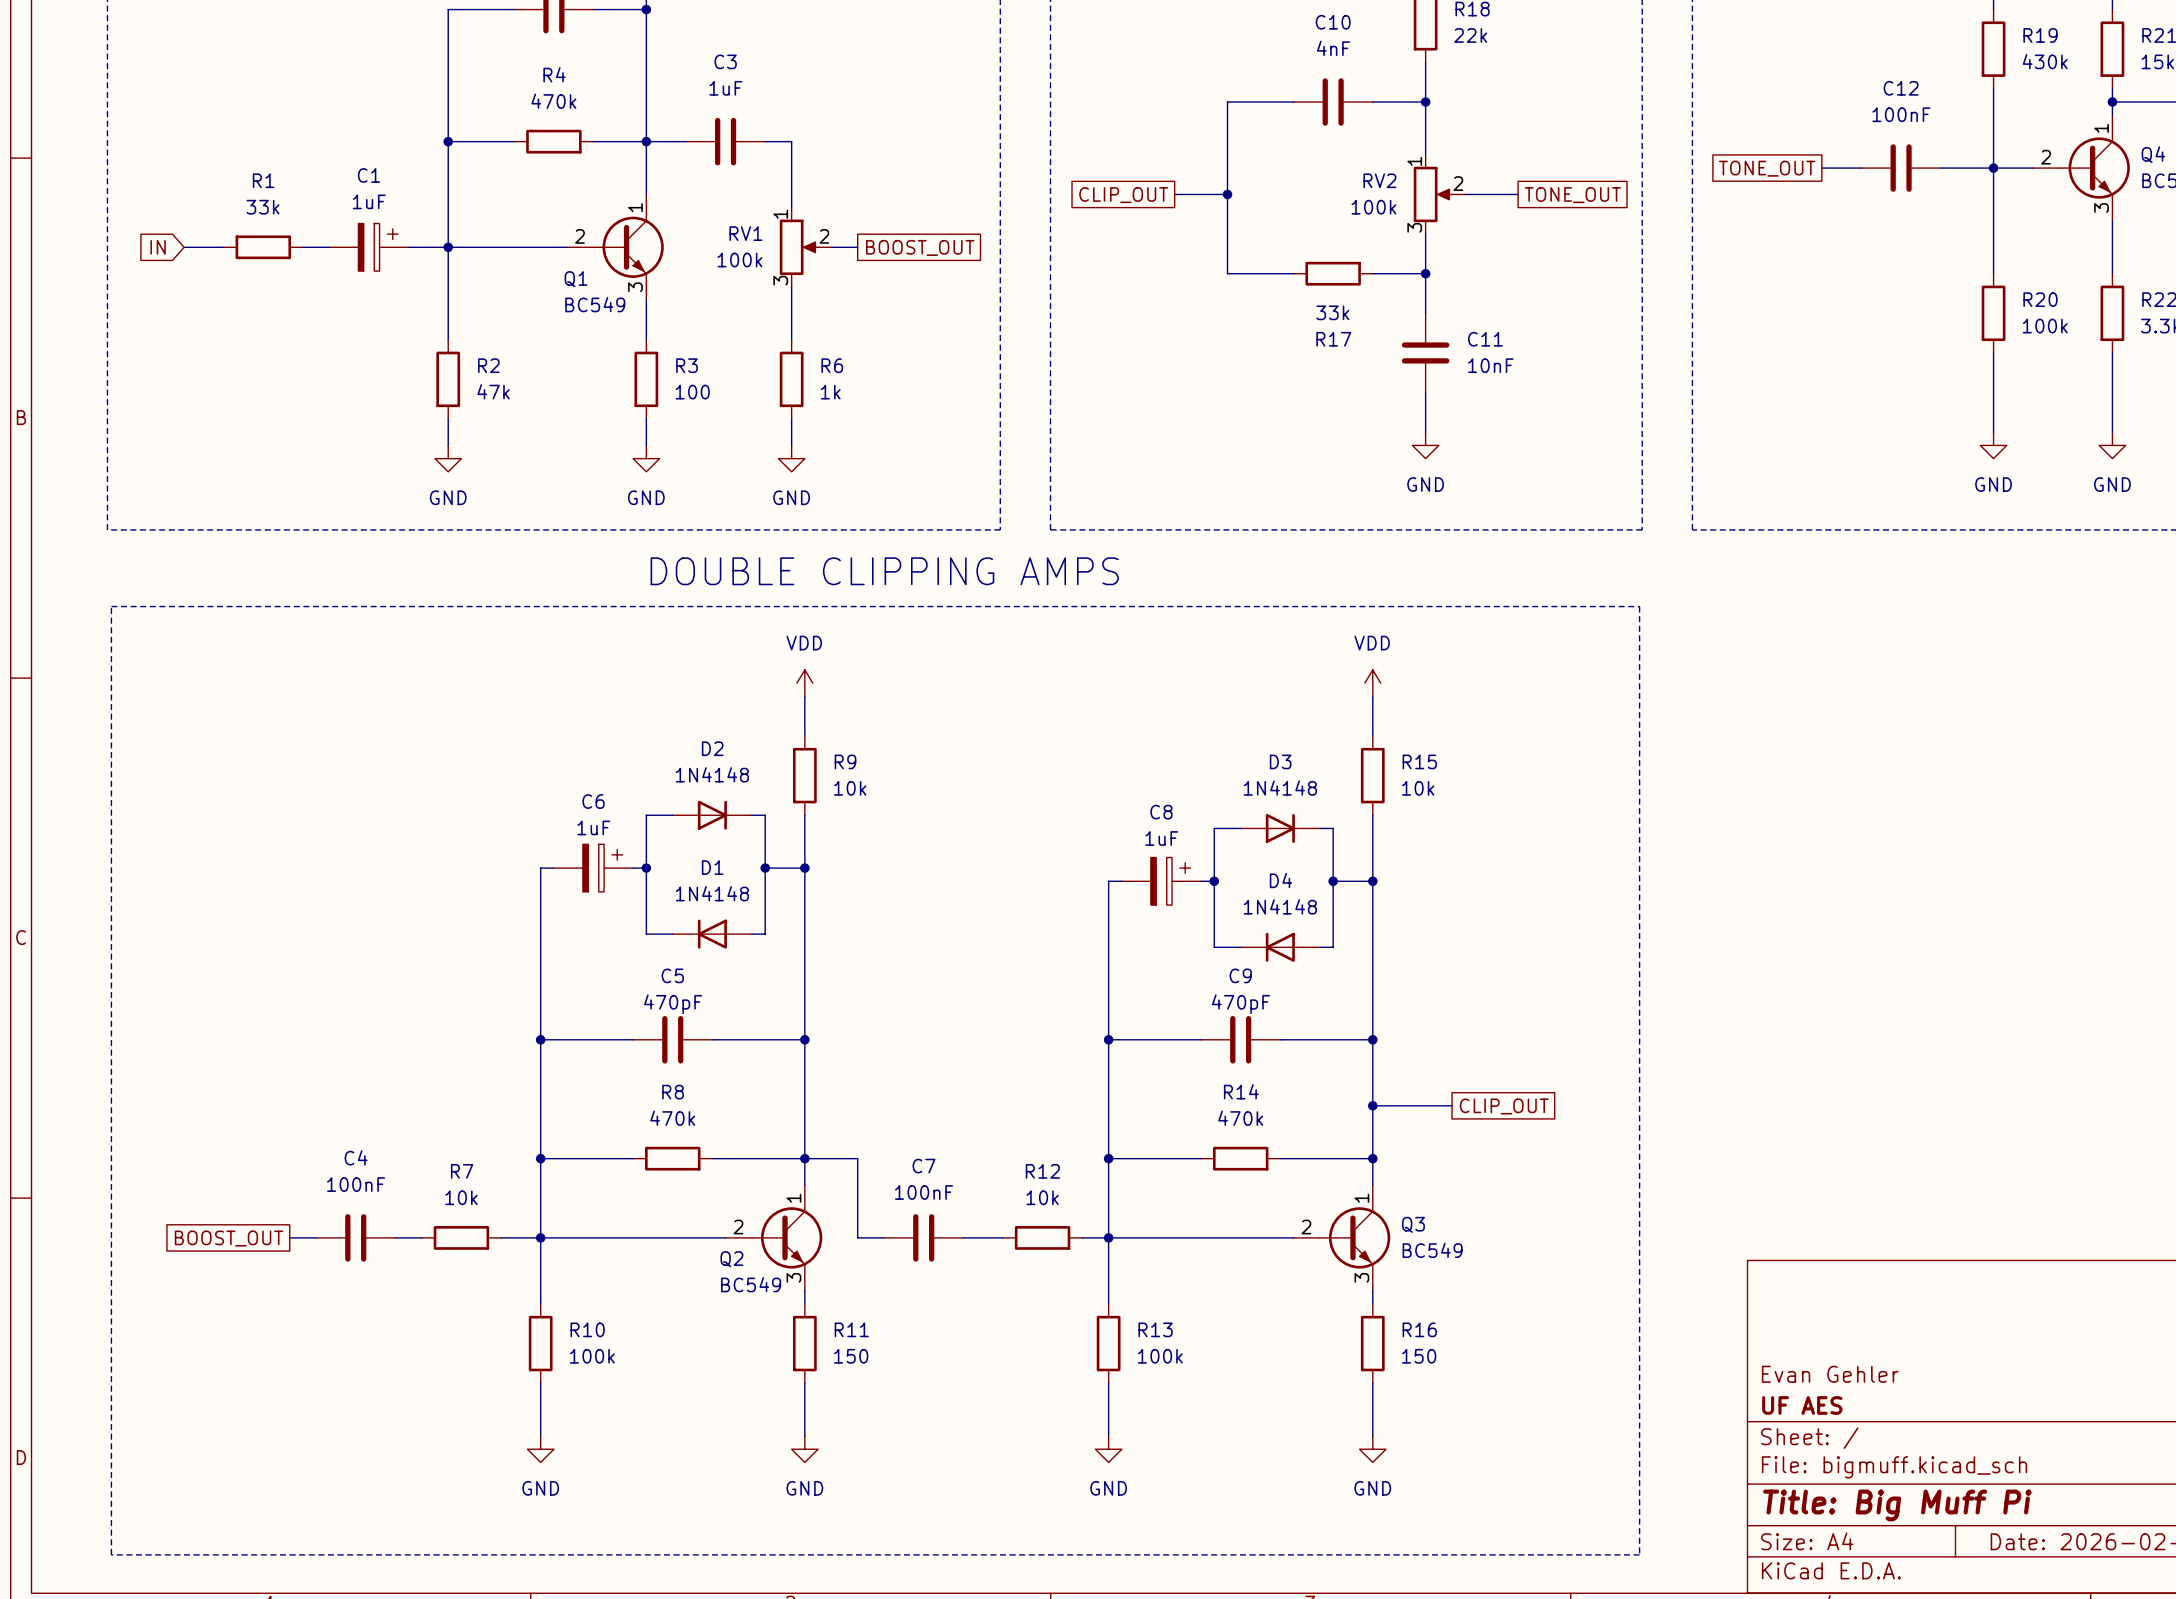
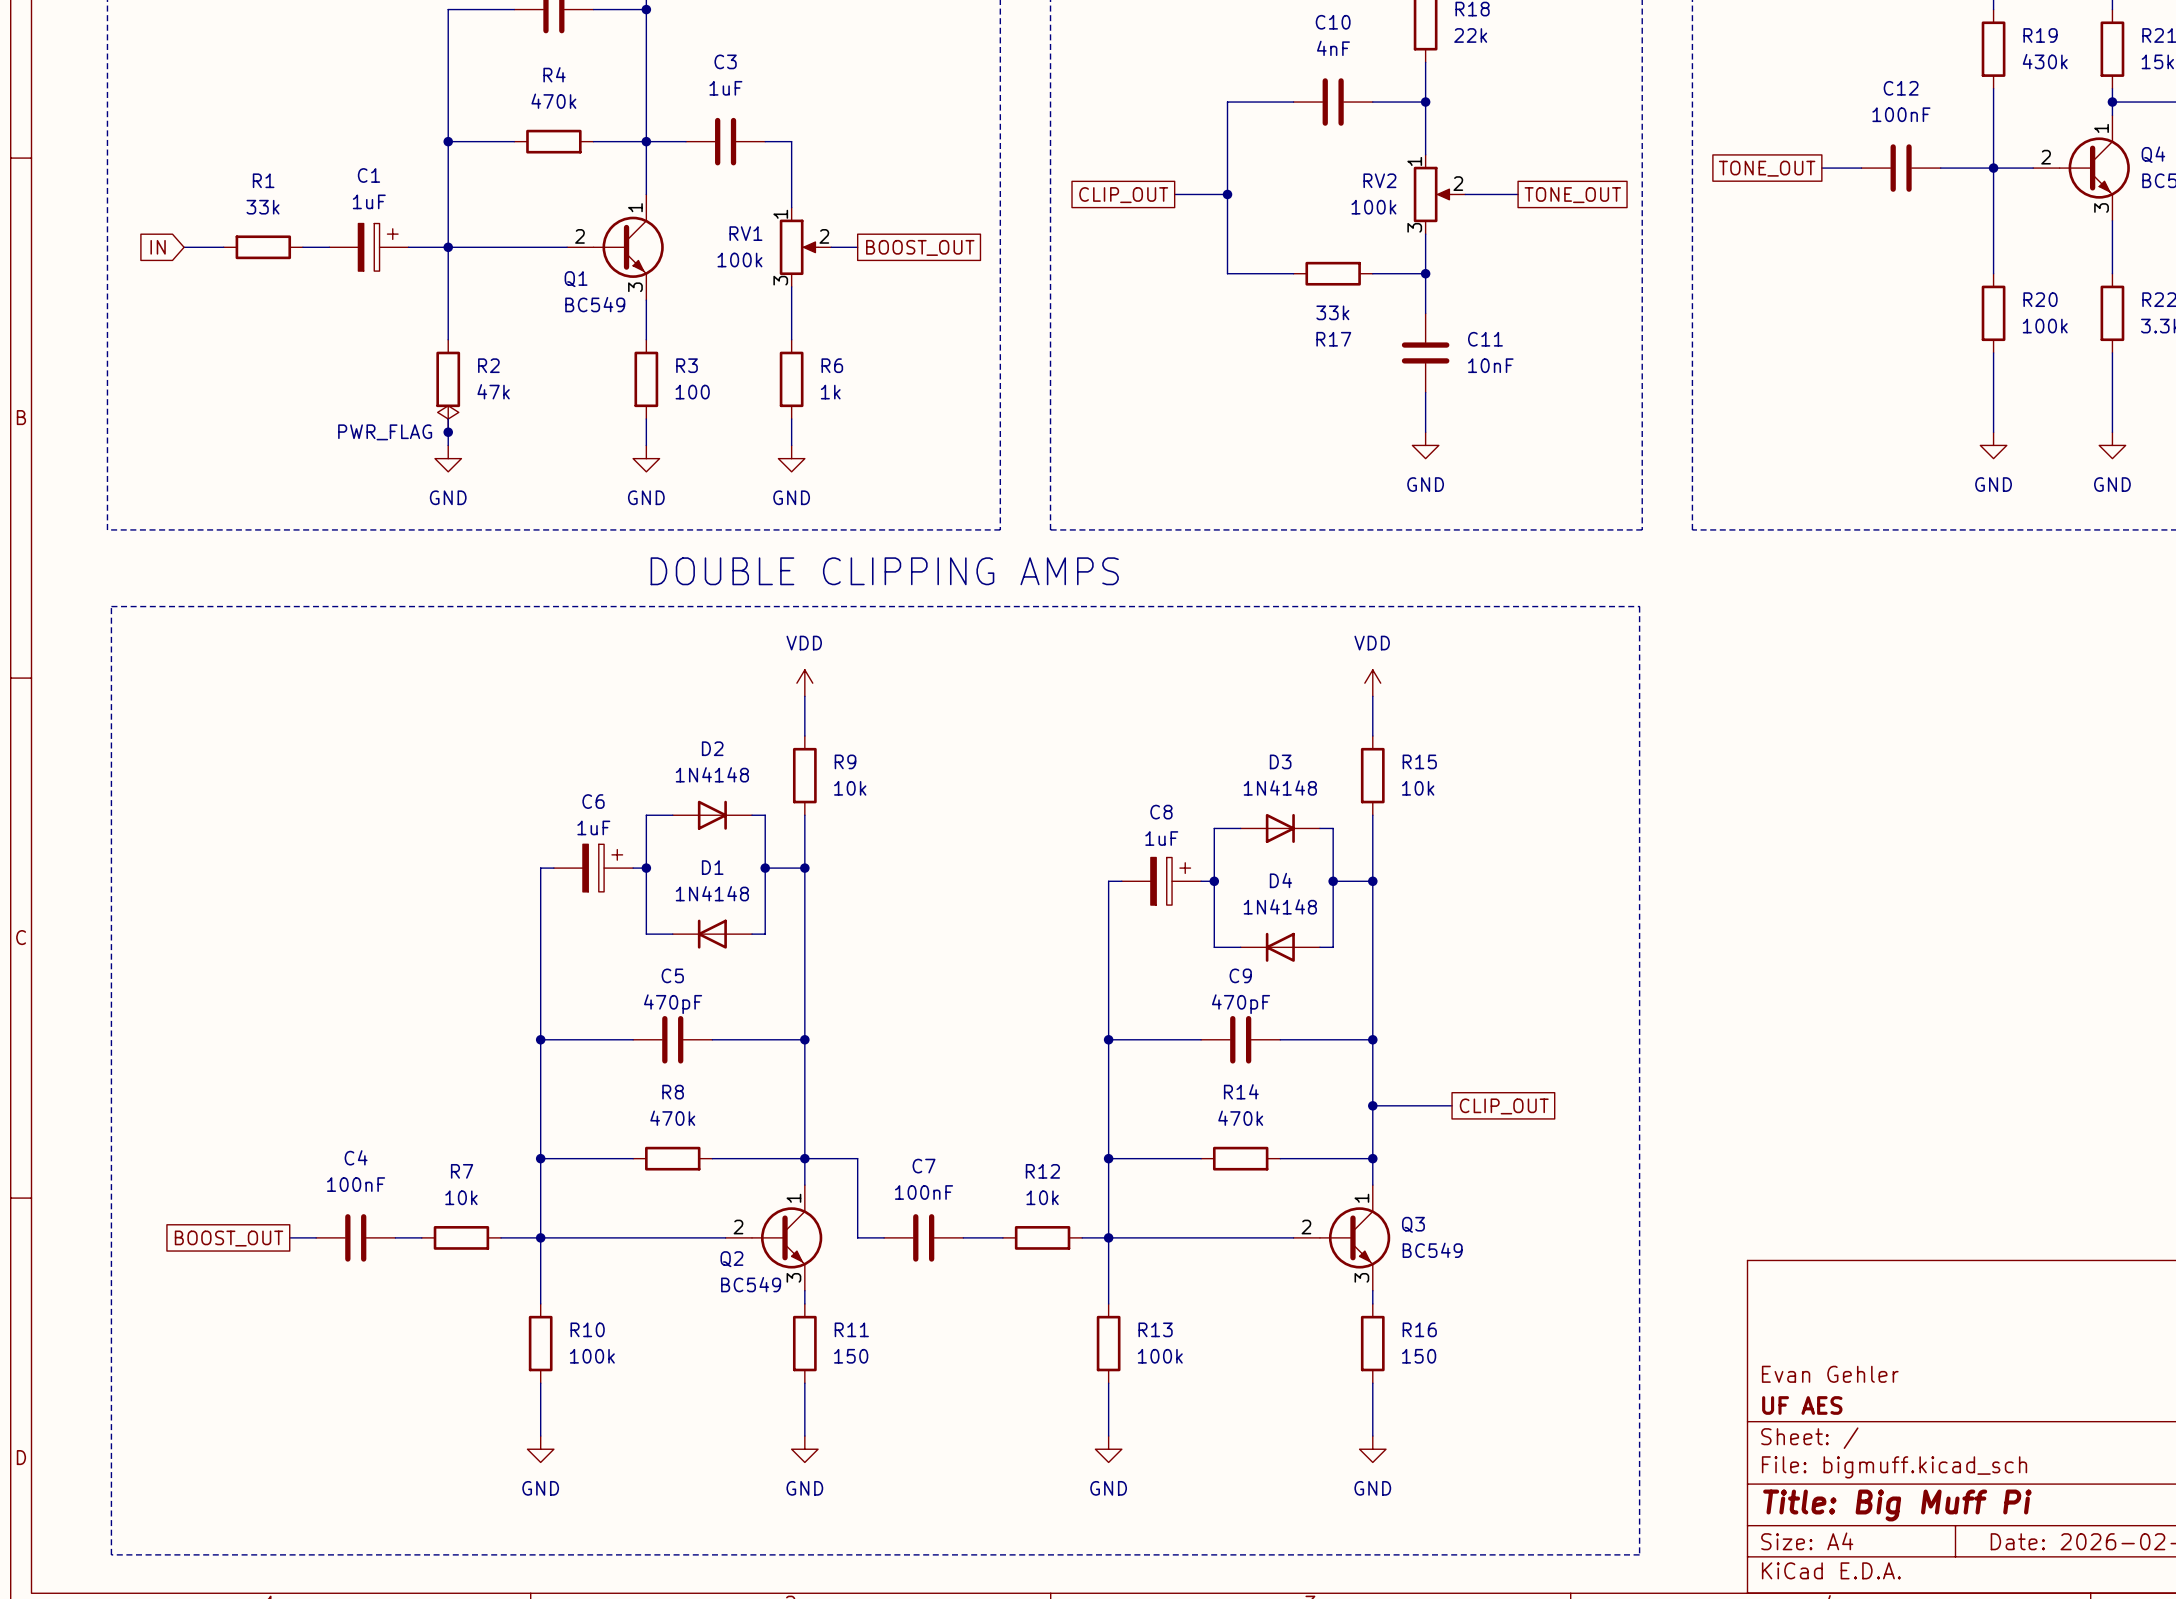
power symbol: none -> PWR_FLAG (448, 419)
junction: none -> (448, 432)

